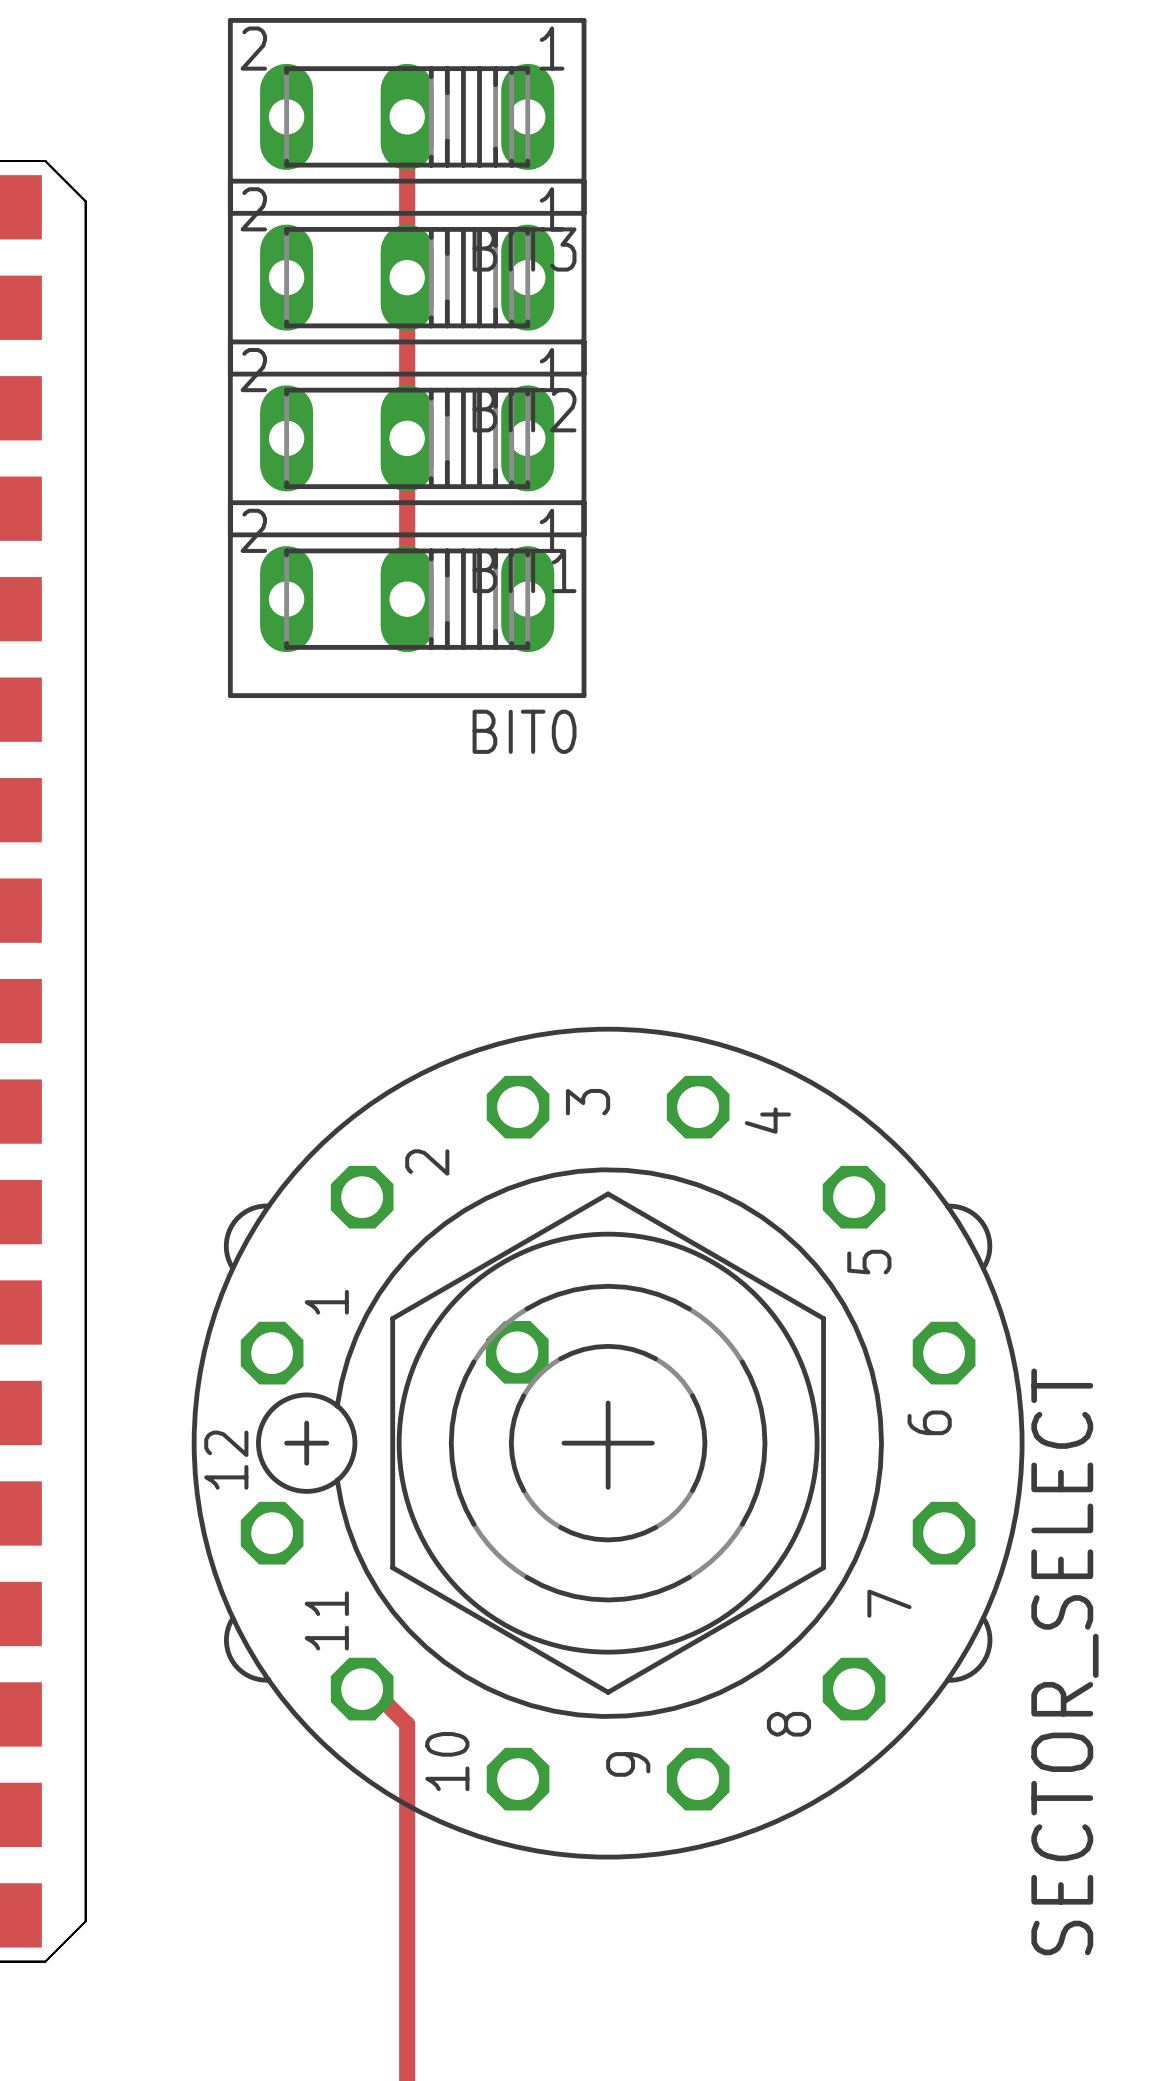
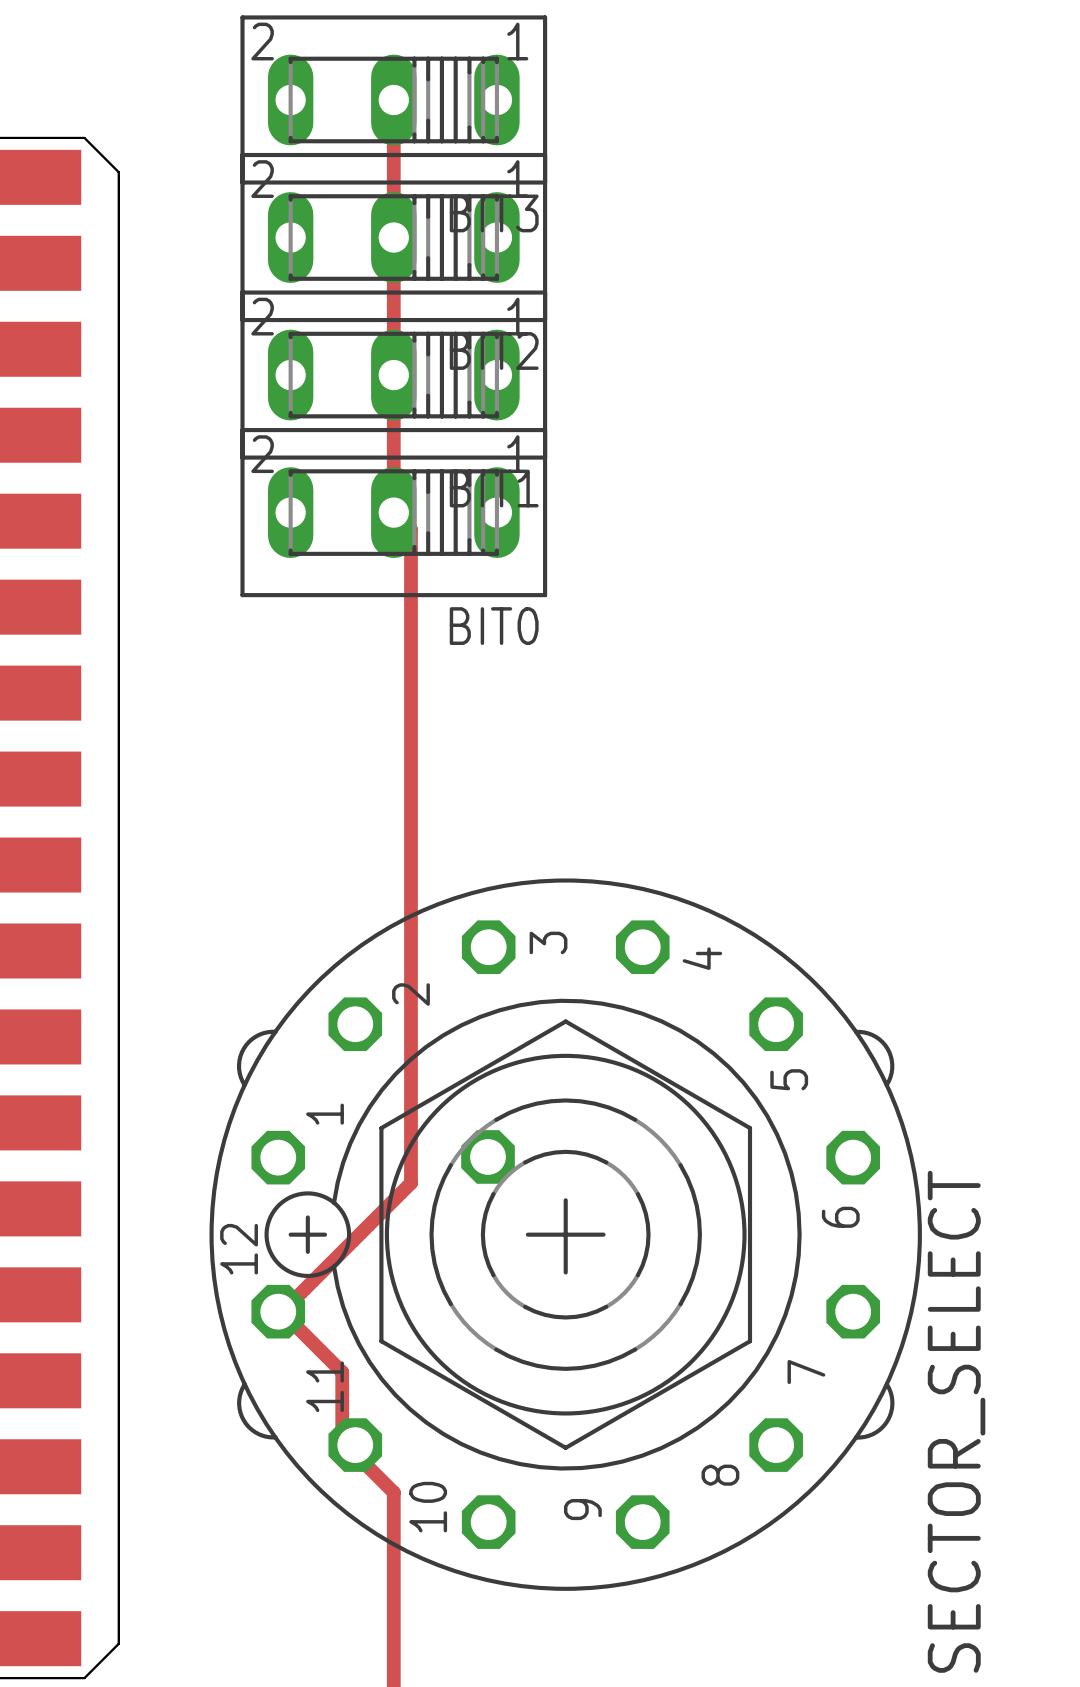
track: (362, 1689) (366, 1684) (407, 1724) (407, 1744) -> (393, 512) (410, 529) (410, 1183) (290, 1303) (278, 1311) (290, 1320) (342, 1372) (342, 1440) (355, 1445) (359, 1458) (393, 1492)

